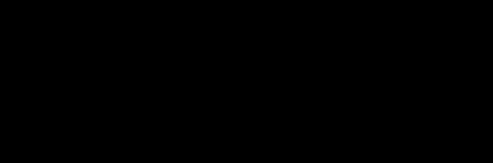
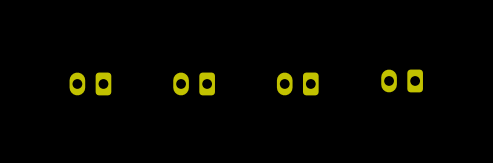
part: none -> (402, 80)
part: none -> (90, 83)
part: none -> (194, 83)
part: none -> (297, 83)

